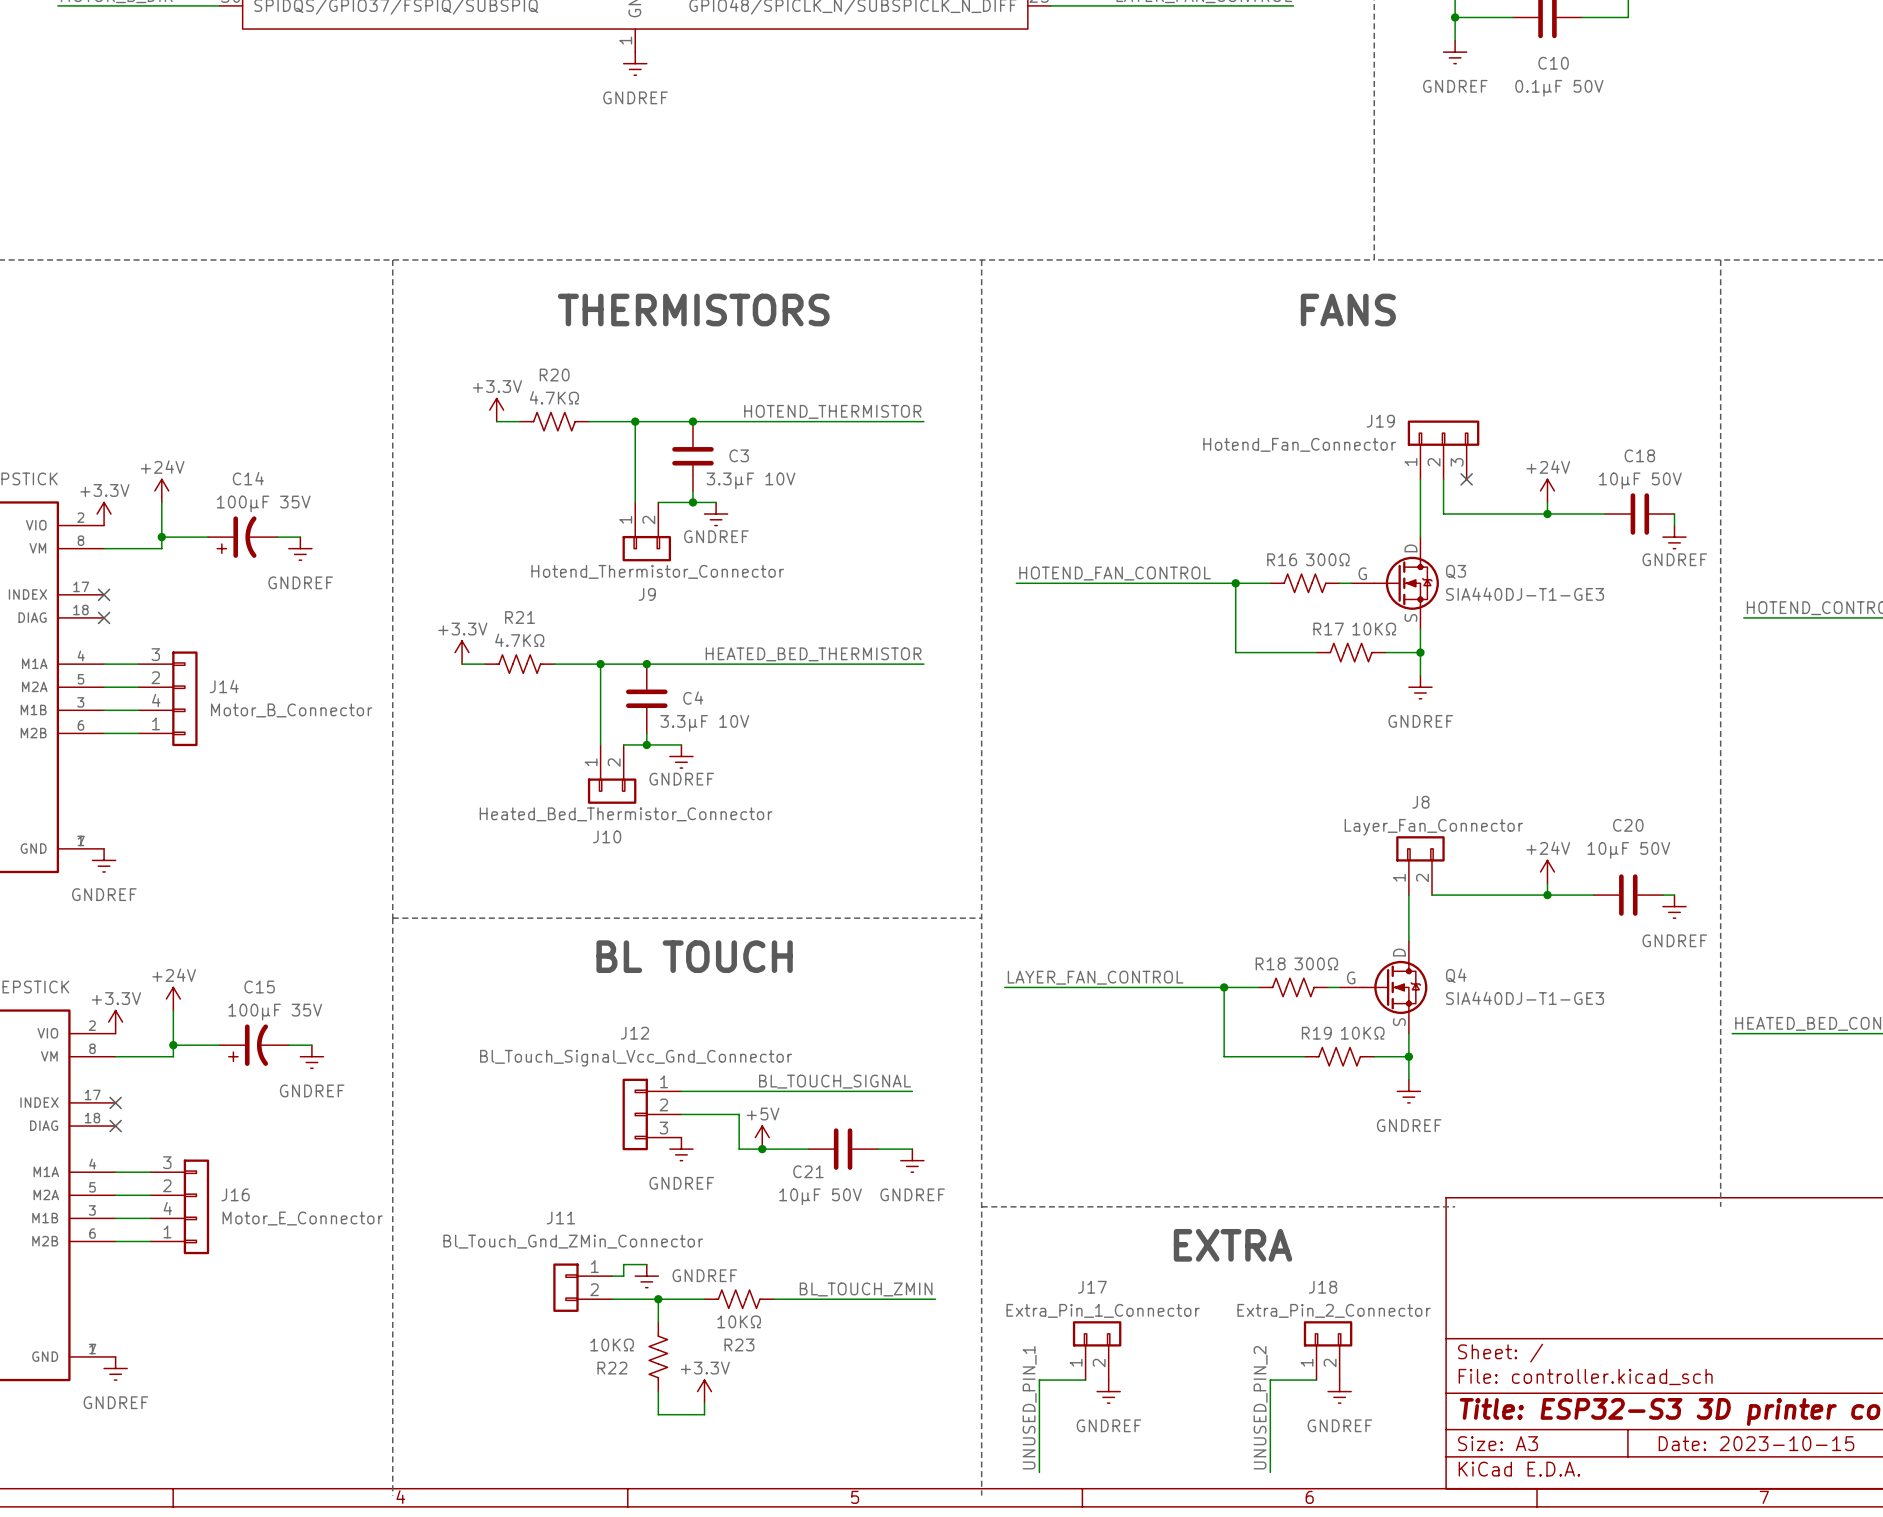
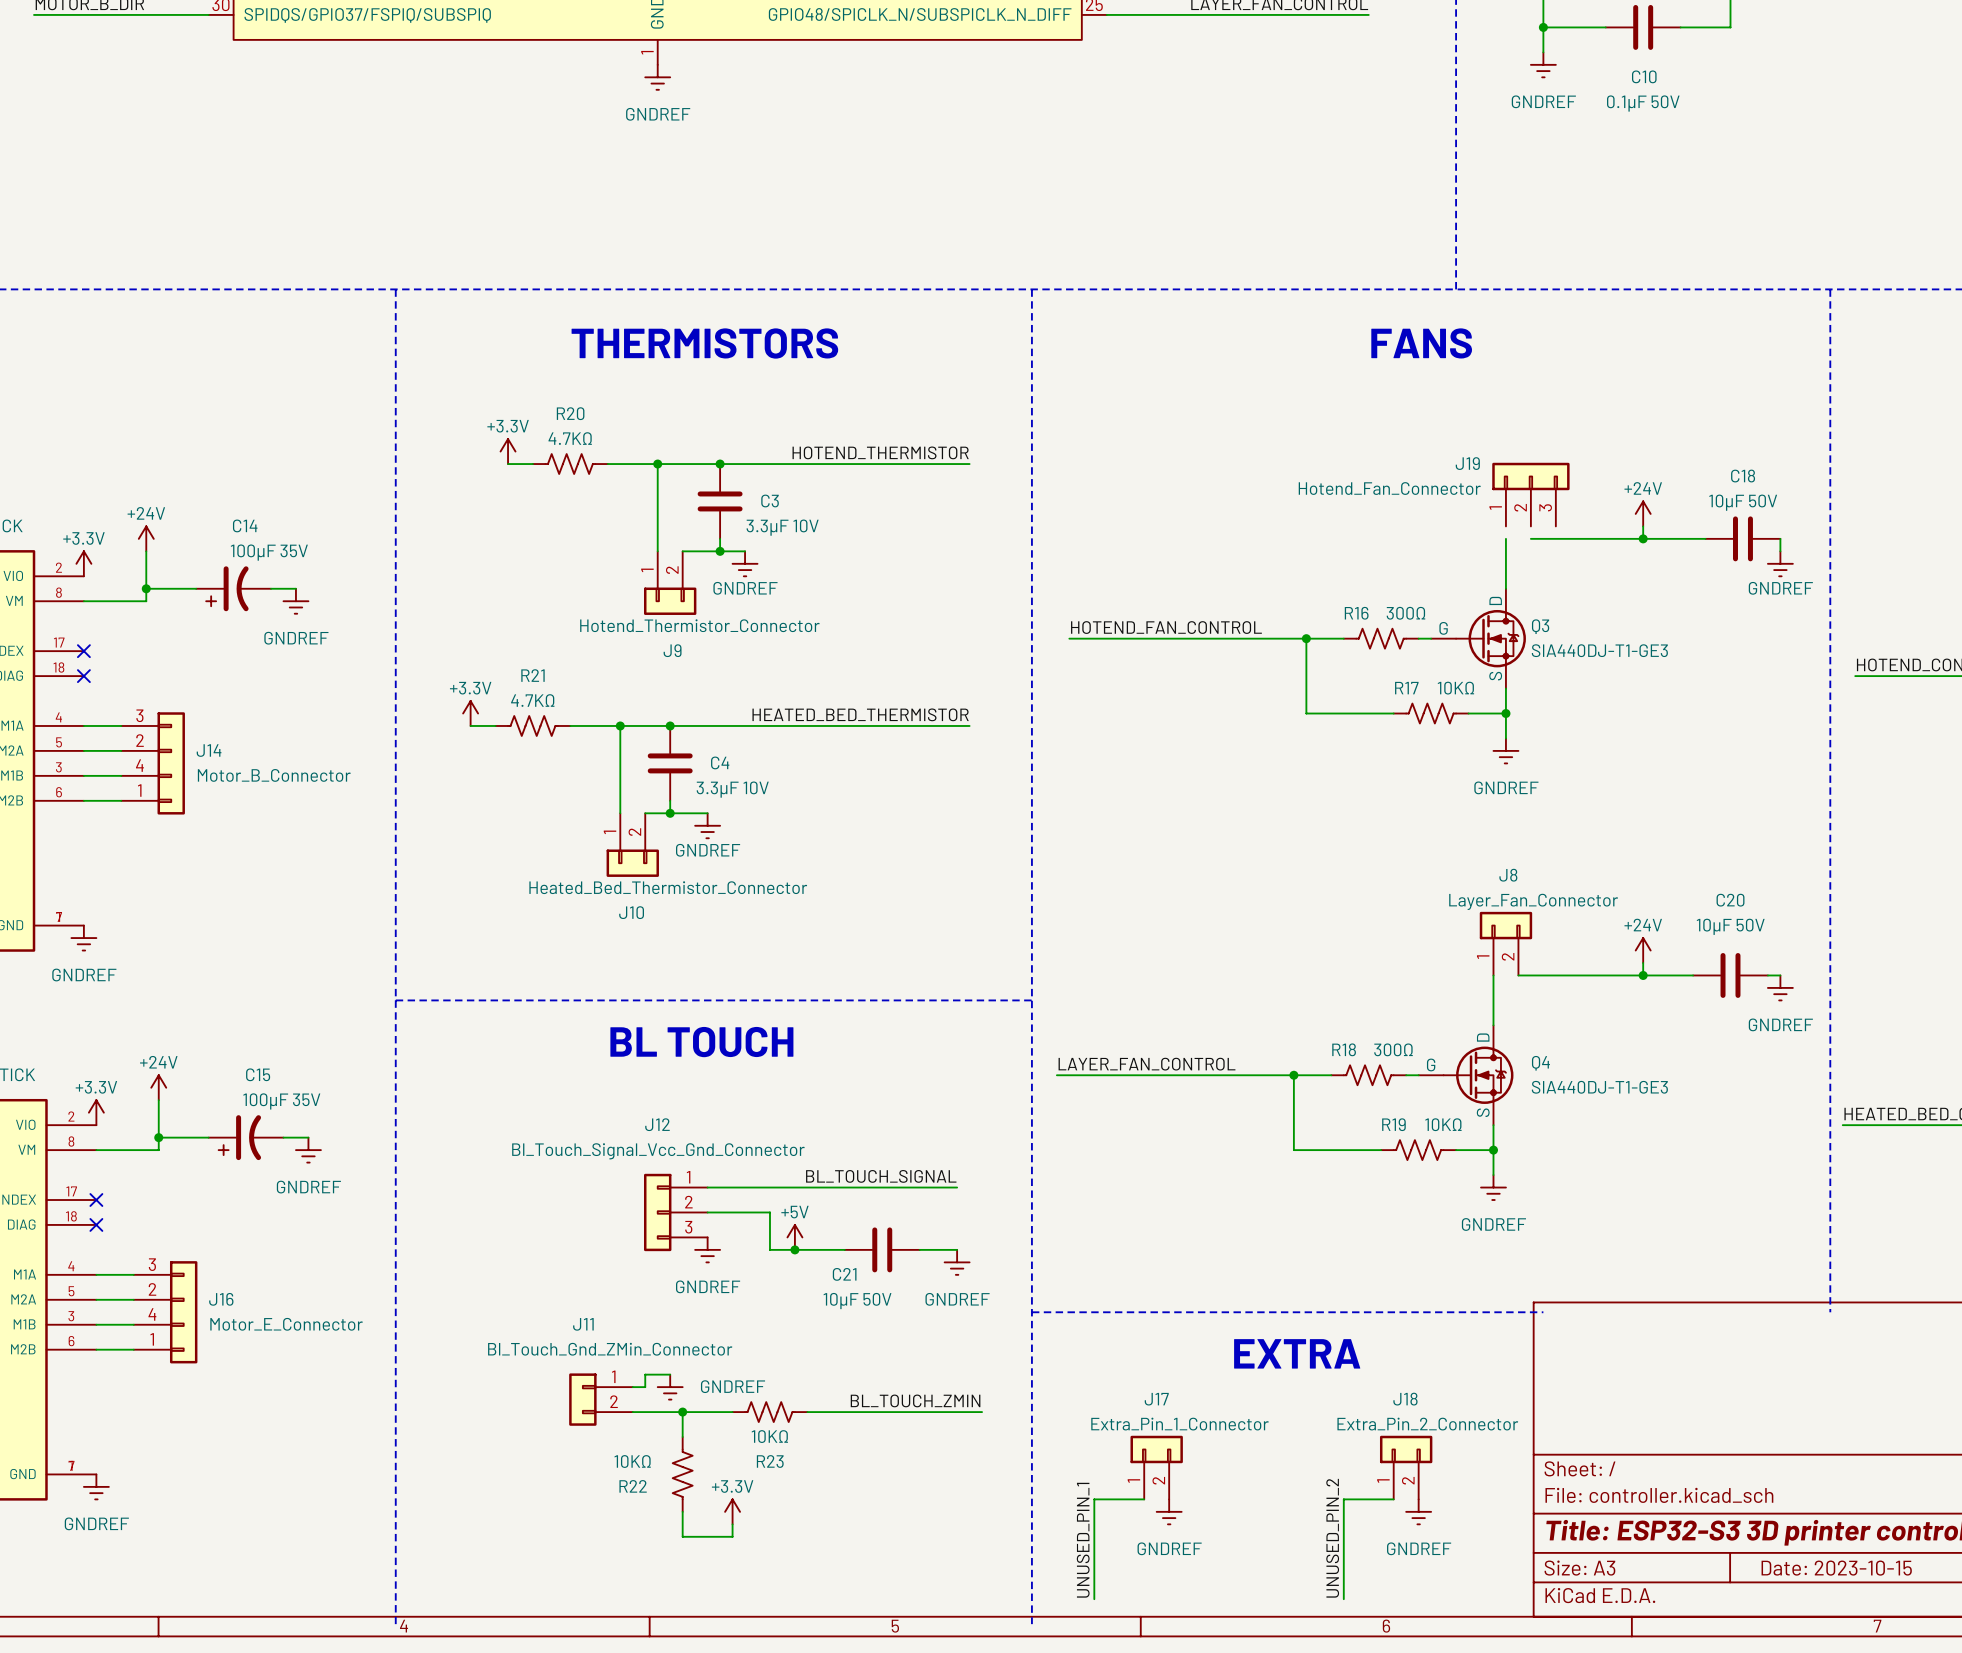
wire: (1420, 479) (1420, 490) -> none
wire: (1443, 479) (1443, 514) (1605, 514) -> none
no-connect mark: (1466, 479) -> none
wire: none -> (1530, 538) (1705, 538)
power symbol position: +24V (1547, 490) -> +24V (1643, 513)
junction position: (1547, 514) -> (1643, 538)
C18 position: (1639, 514) -> (1742, 538)
wire: (1674, 514) (1674, 525) -> (1780, 538) (1780, 551)
power symbol position: GNDREF (1674, 537) -> GNDREF (1780, 563)

